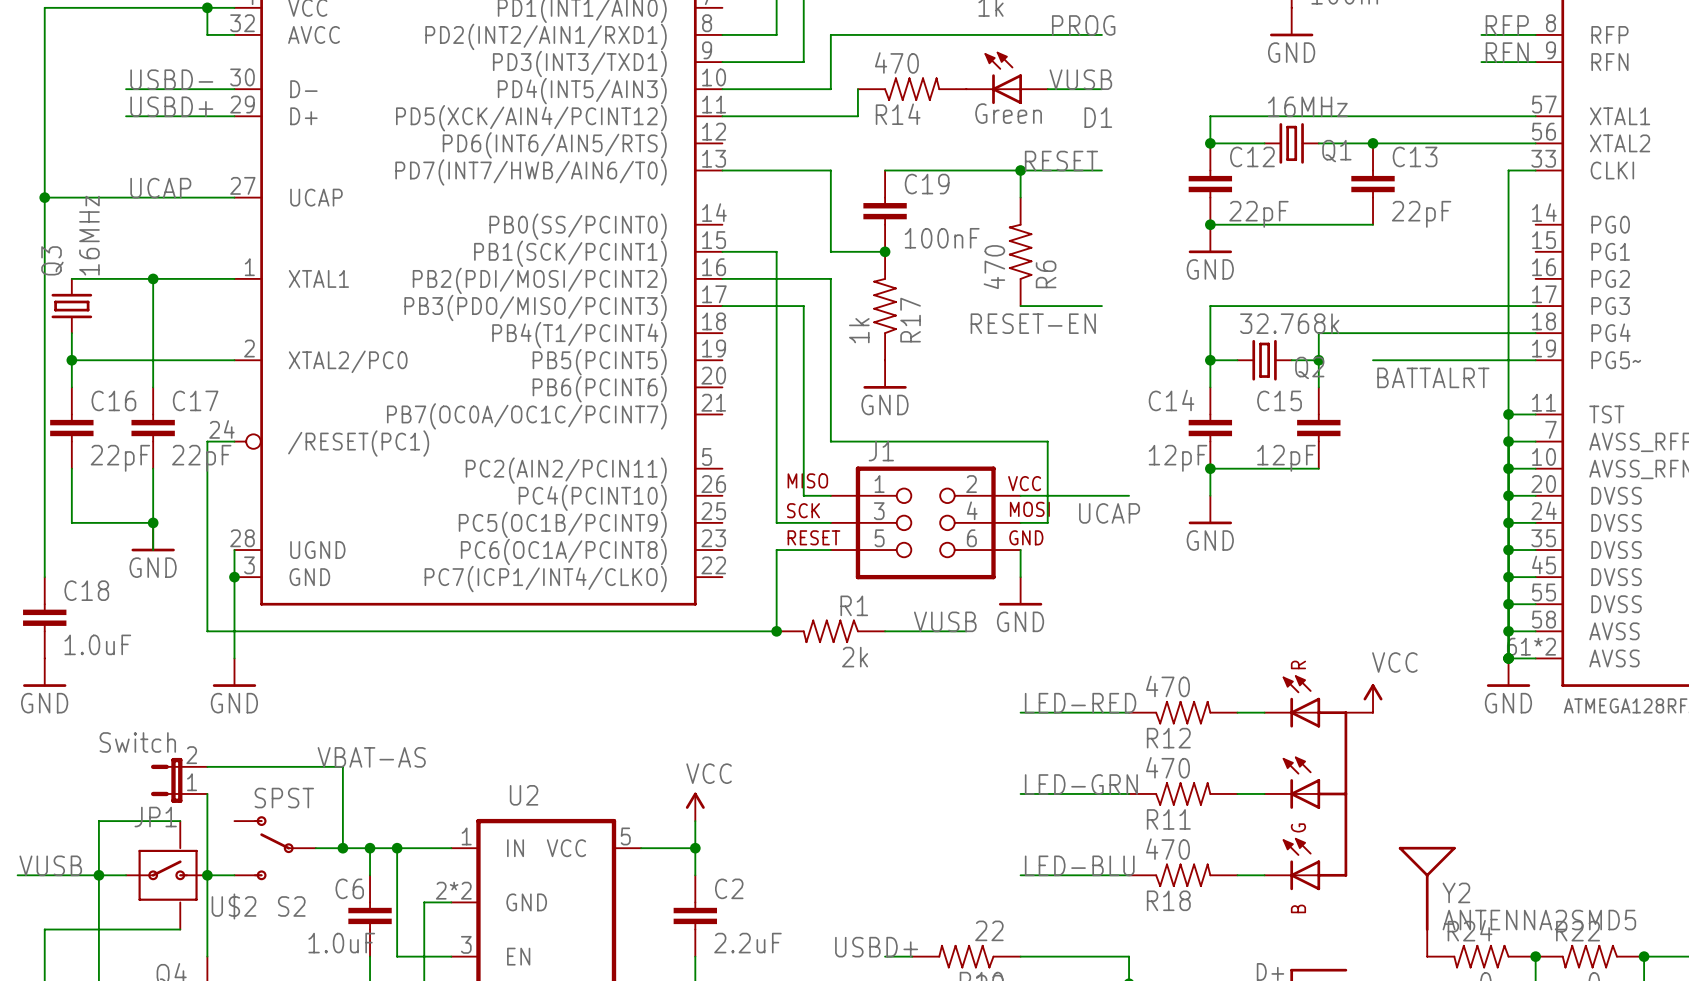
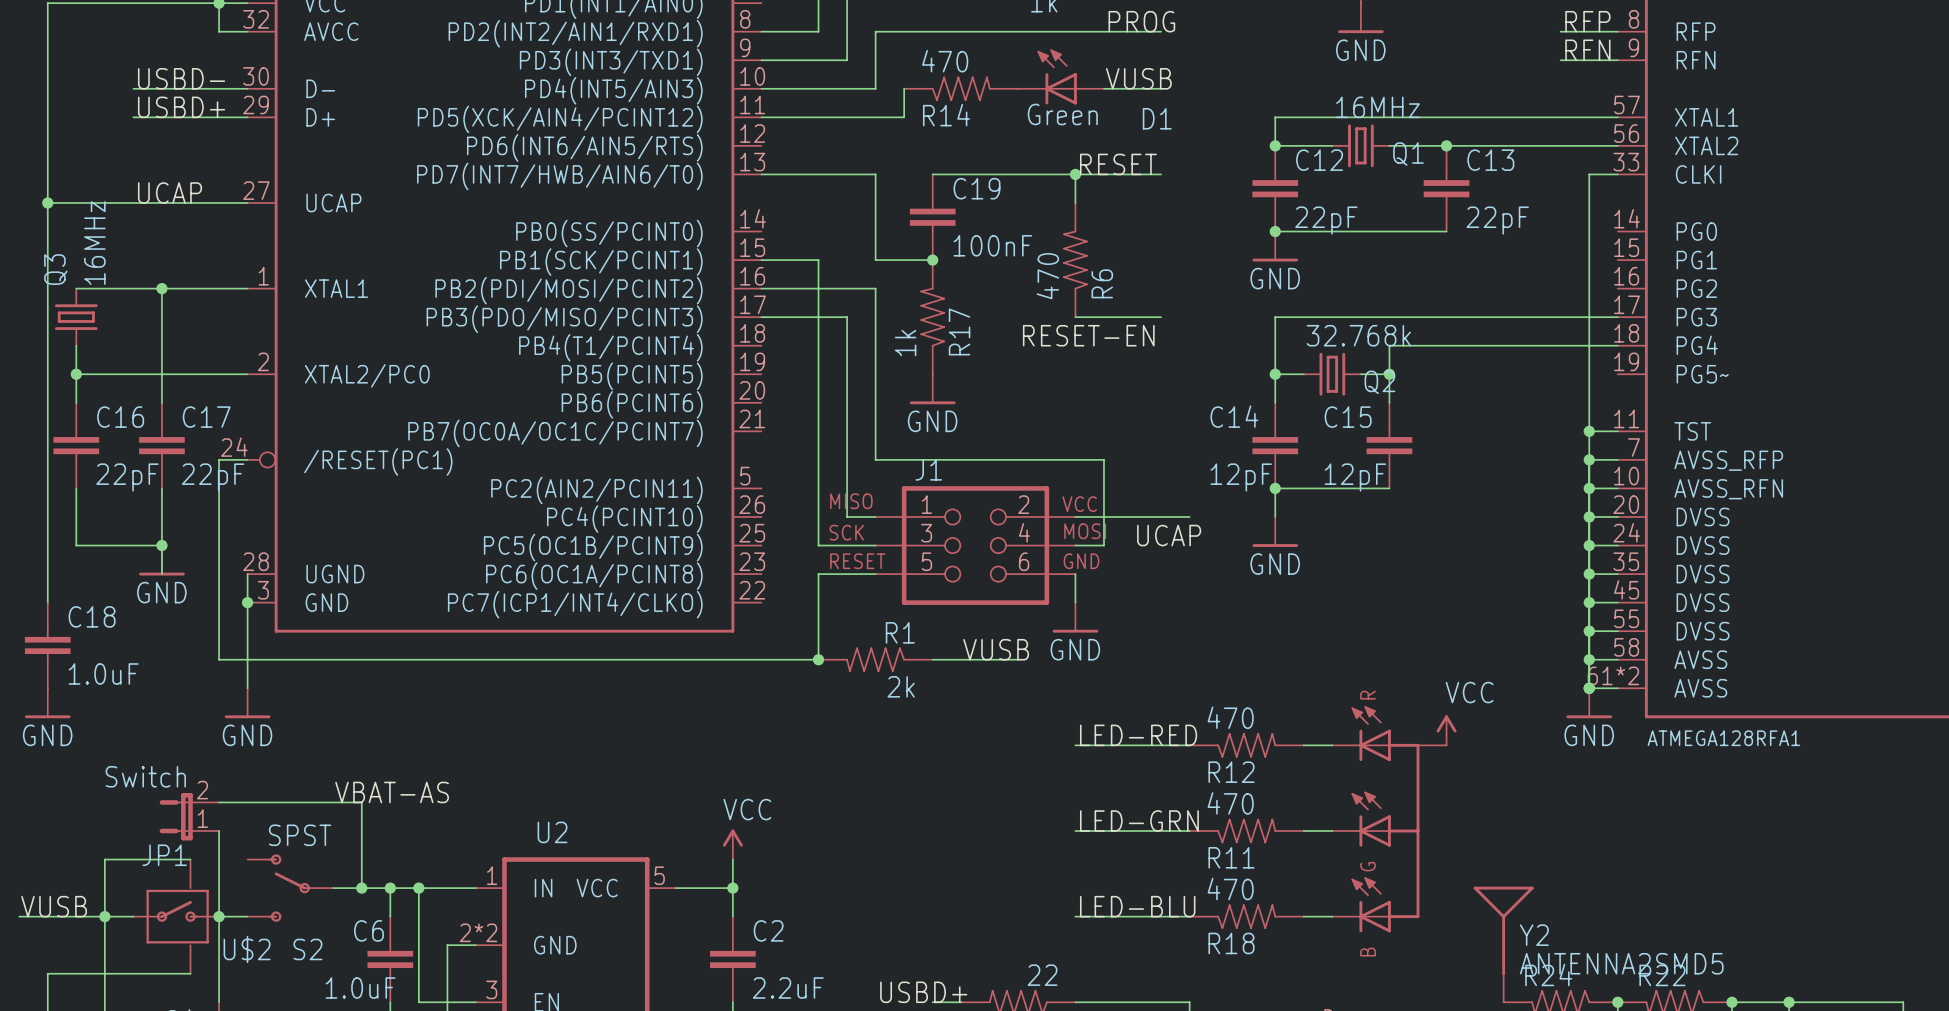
wire: (1373, 360) (1535, 360) -> none
label: BATTALRT (1433, 377) -> none

